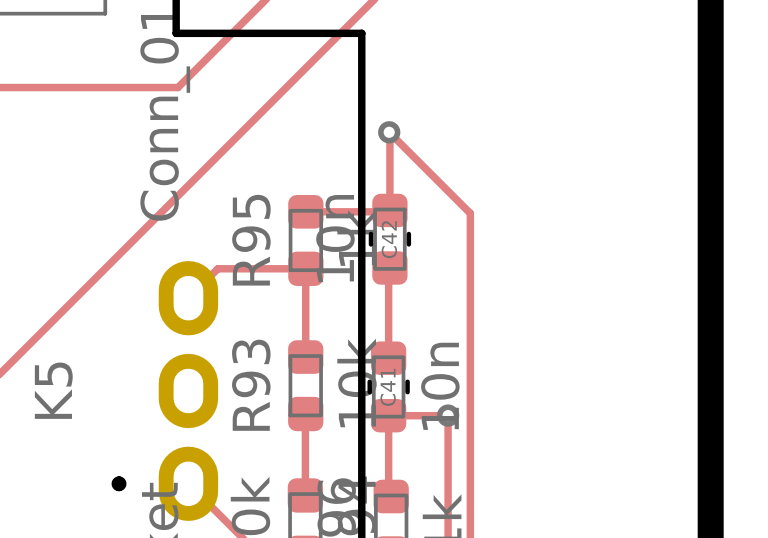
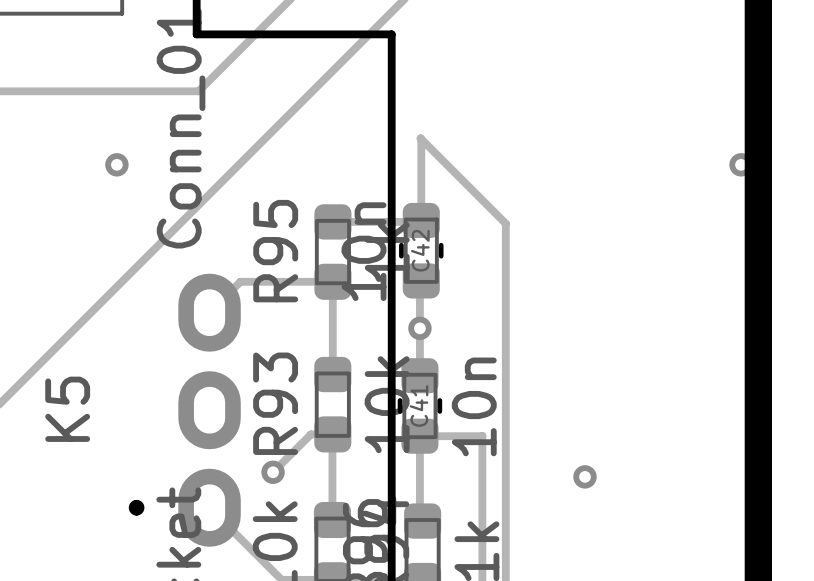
via: (389, 132) -> none
via: none -> (116, 164)
via: none -> (741, 164)
via: none -> (419, 328)
track: none -> (332, 434) (310, 434) (273, 472)
via: (448, 415) -> none
via: none -> (273, 472)
via: none -> (585, 476)

